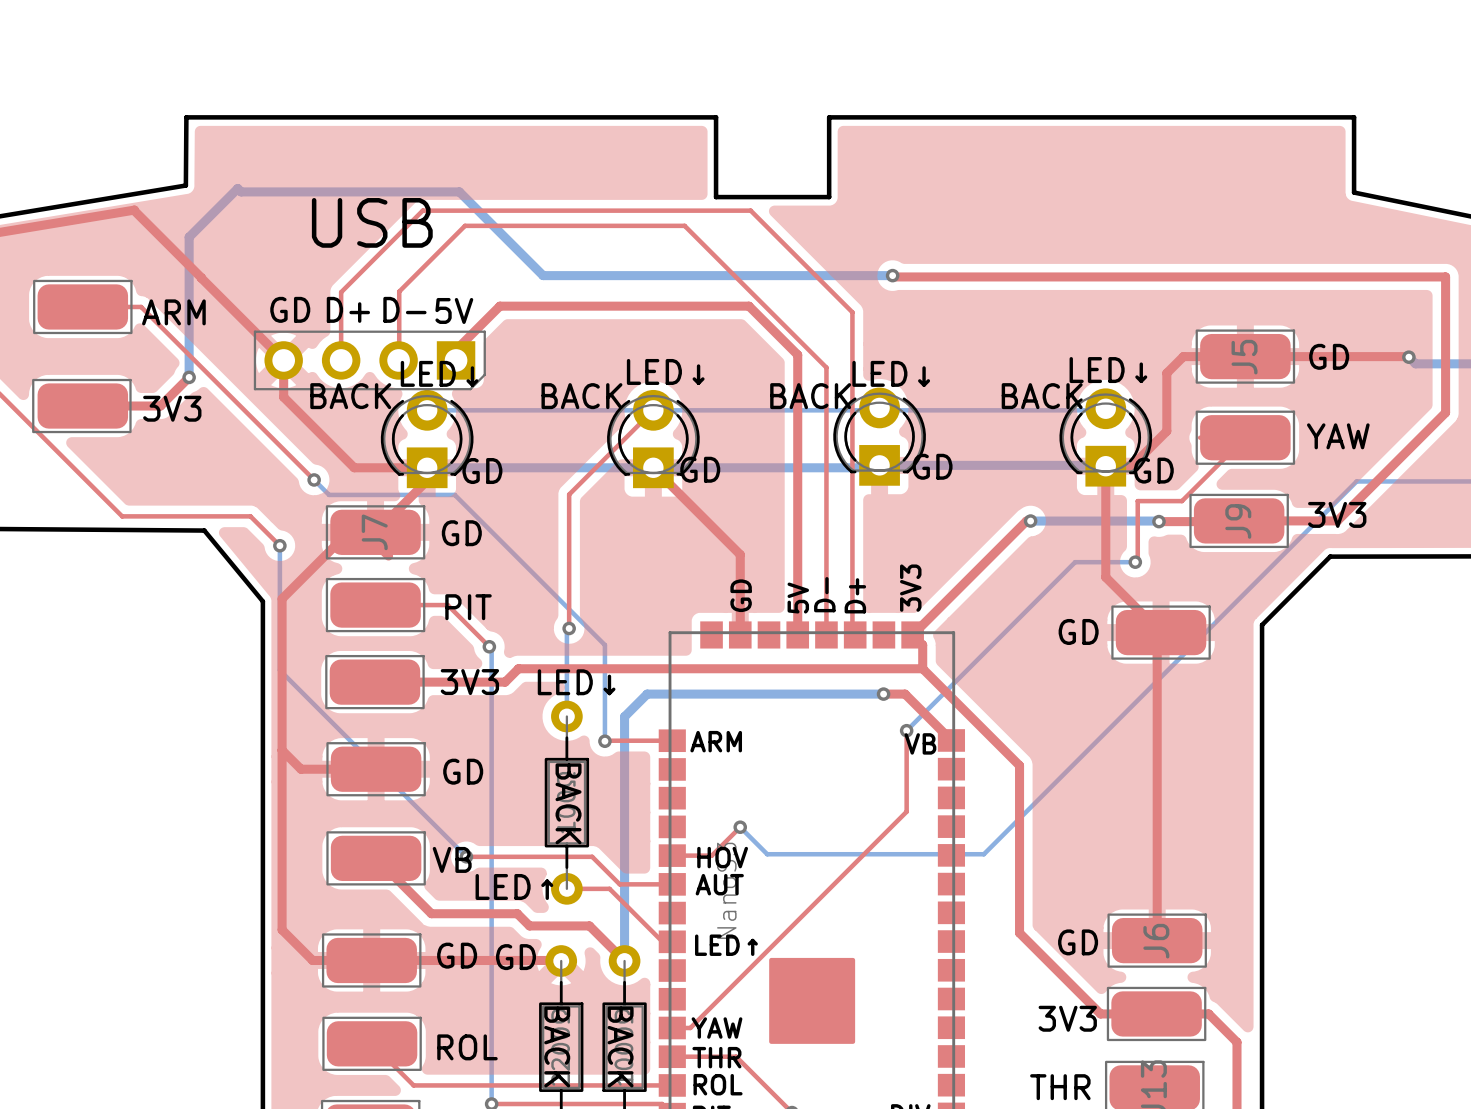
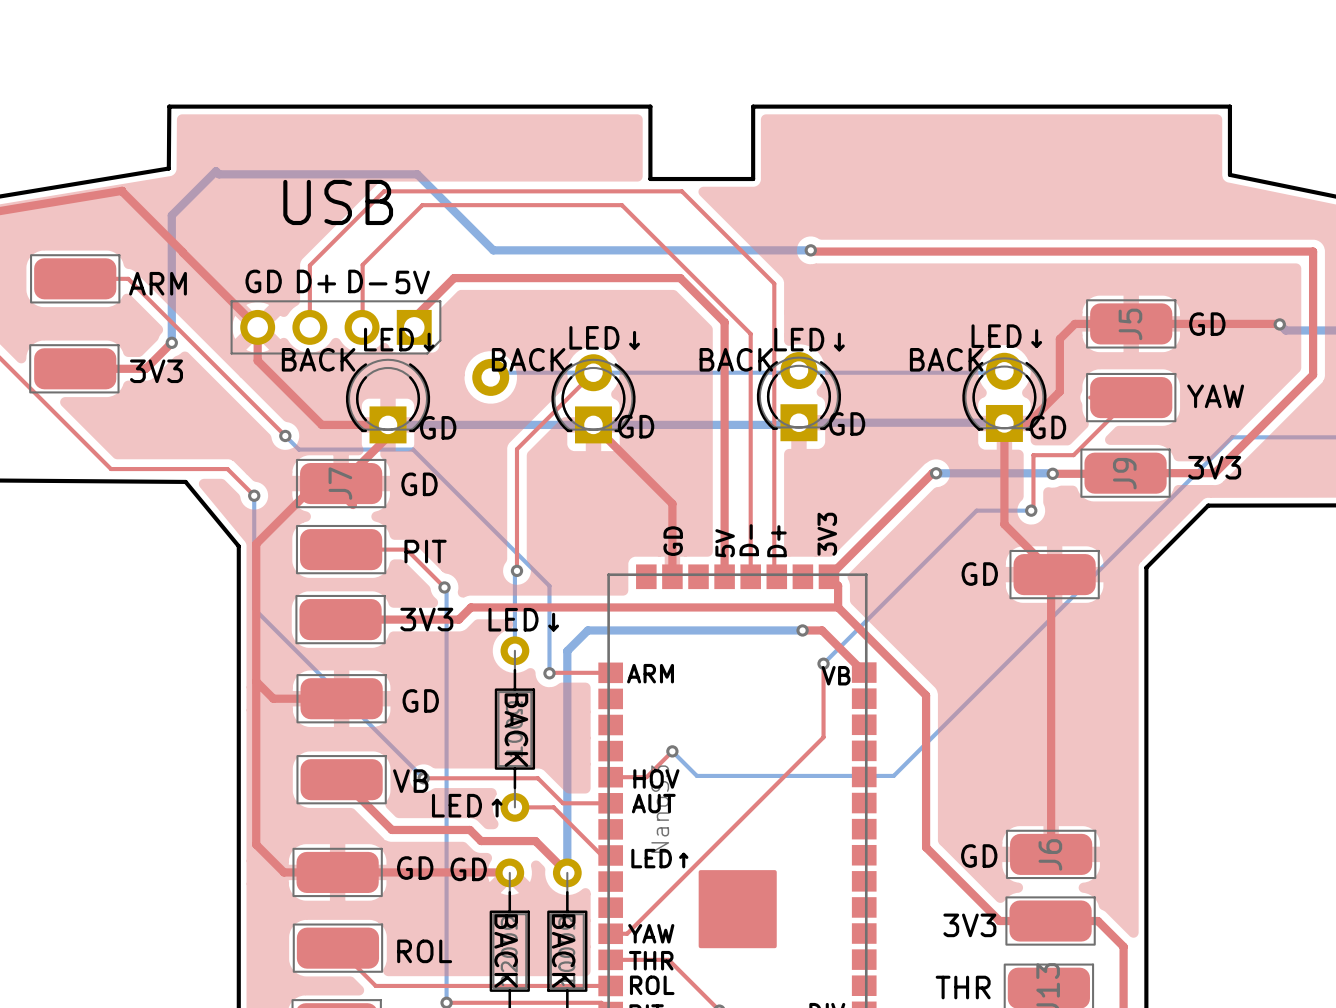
bottom track: (427, 410) (522, 410) -> none
part: (427, 439) -> none
part: none -> (427, 401)

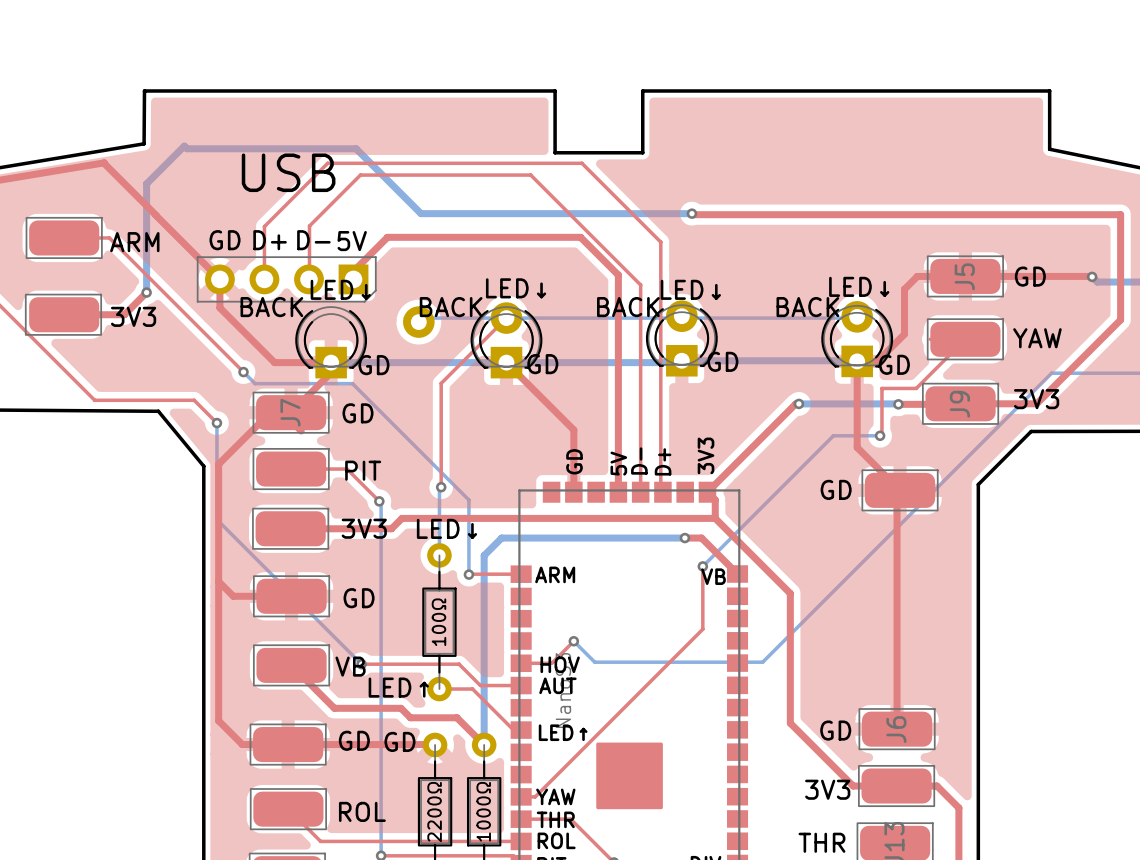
text: BACK (516, 730) -> none
text: BACK (506, 951) -> none
text: BACK (563, 951) -> none

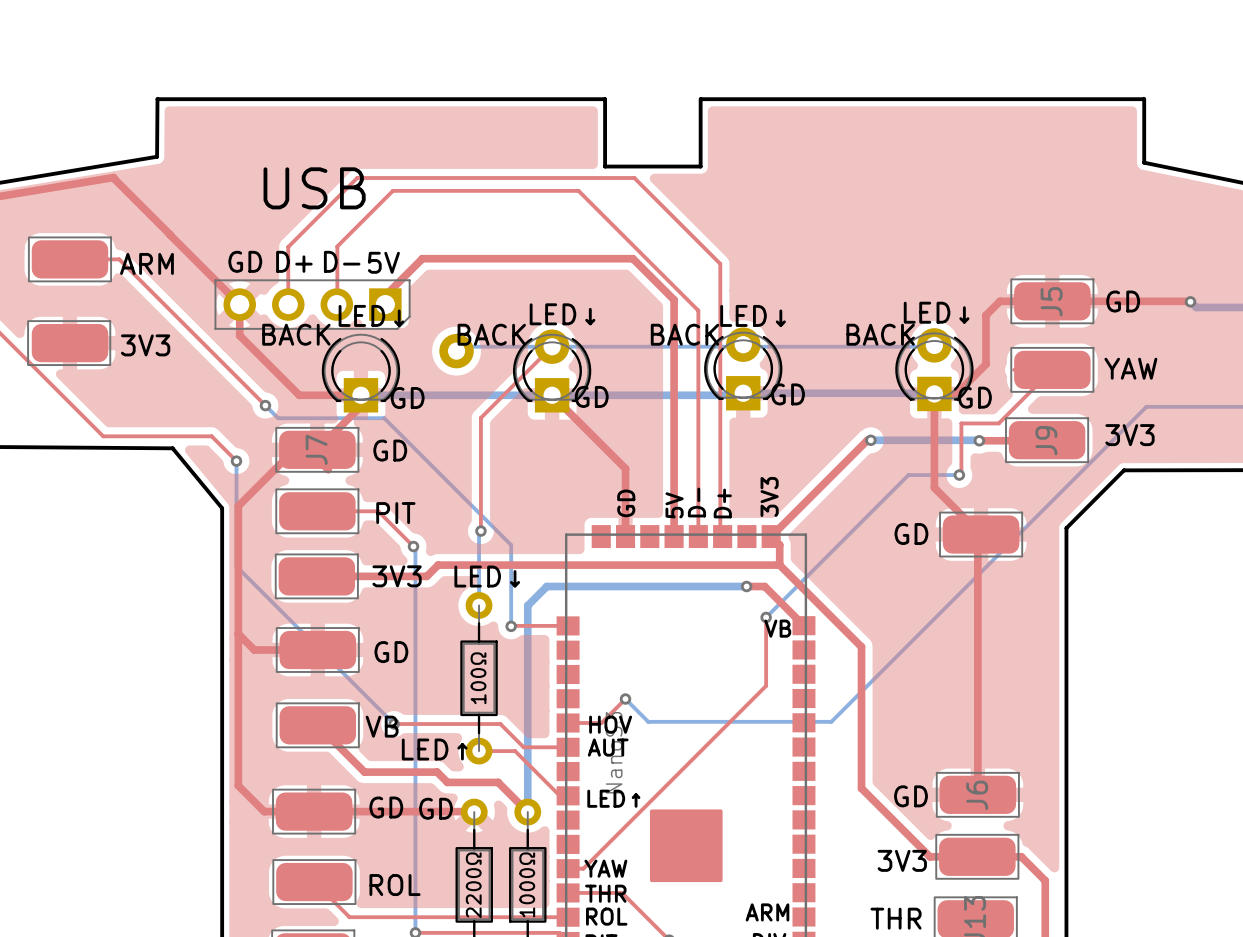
top track: (691, 213) (1120, 214) (1120, 319) (1036, 403) -> none
bottom track: (691, 213) (421, 213) (356, 148) (186, 148) (184, 146) (146, 183) (146, 292) -> none
via: (691, 213) -> none
top track: (146, 292) (124, 314) (63, 314) -> none
via: (146, 292) -> none
top track: (960, 403) (1036, 403) -> none
text position: ARM (555, 574) -> ARM (767, 912)

